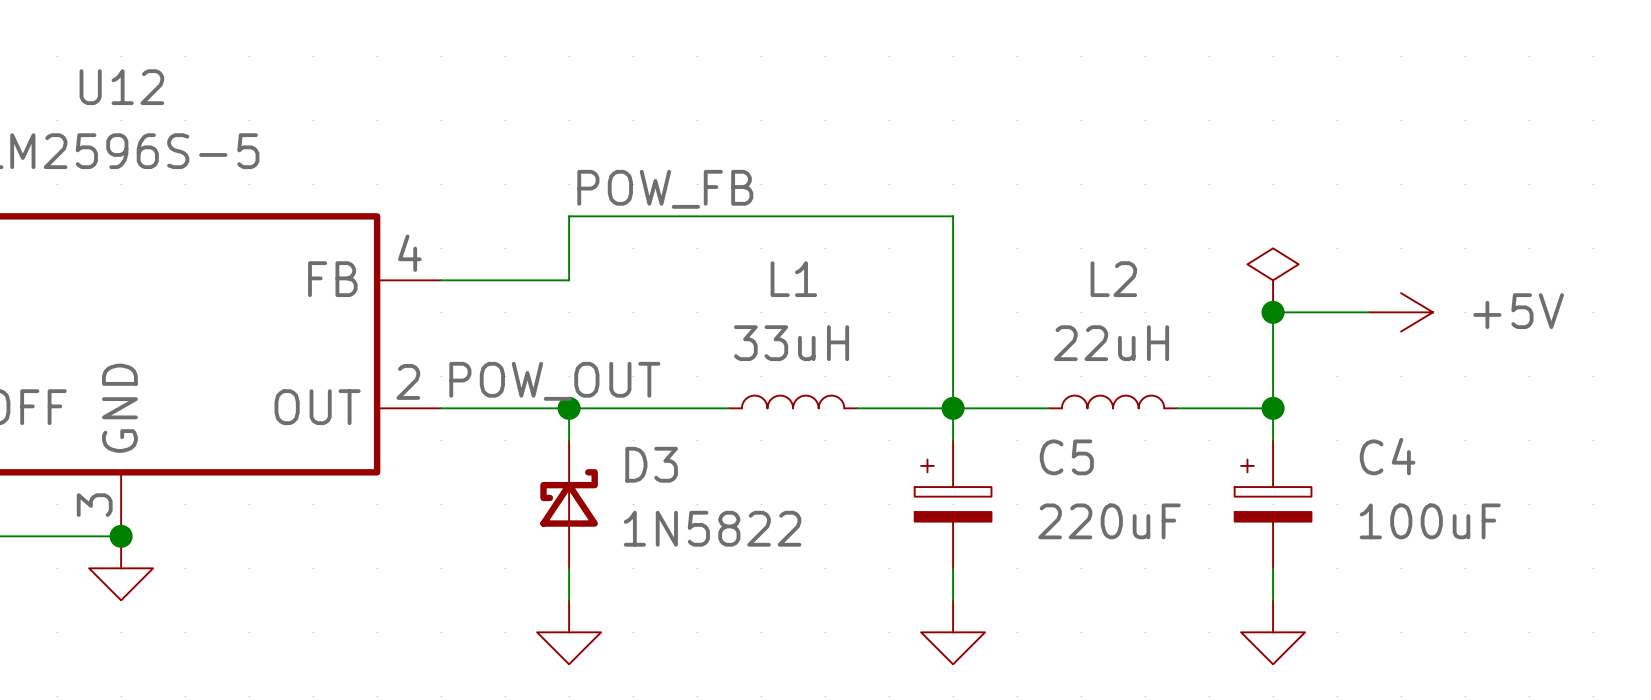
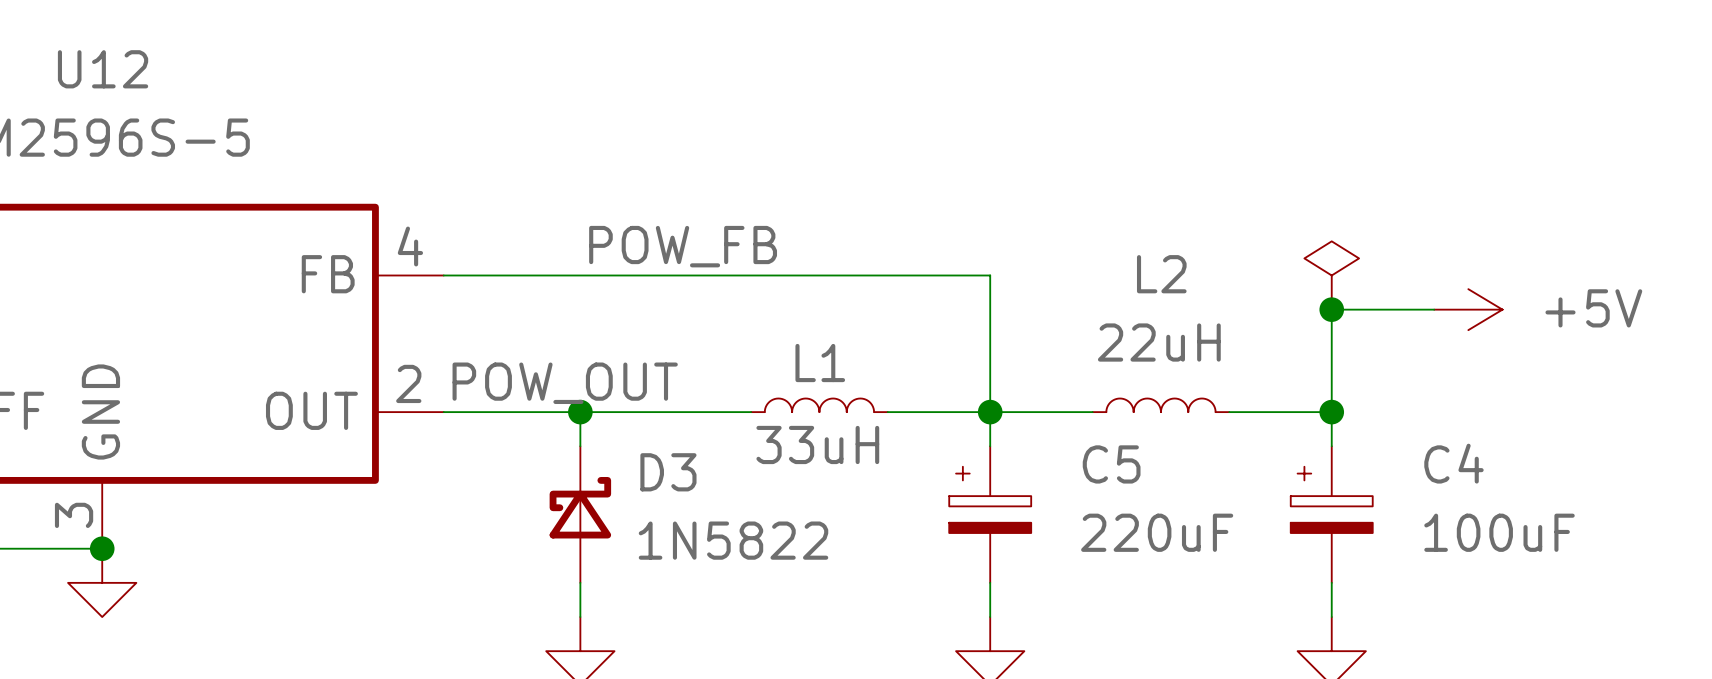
label position: POW_FB (665, 189) -> POW_FB (683, 246)
L1 name position: L1 (793, 279) -> L1 (820, 363)
wire: (569, 280) (569, 216) (953, 216) (953, 280) -> (580, 275) (990, 275)
L1 value position: 33uH (791, 343) -> 33uH (817, 444)

